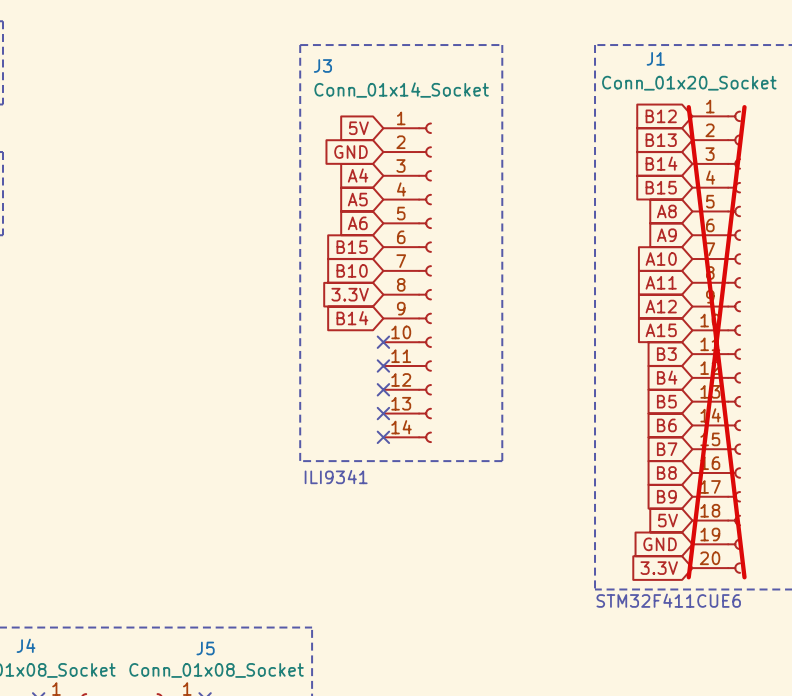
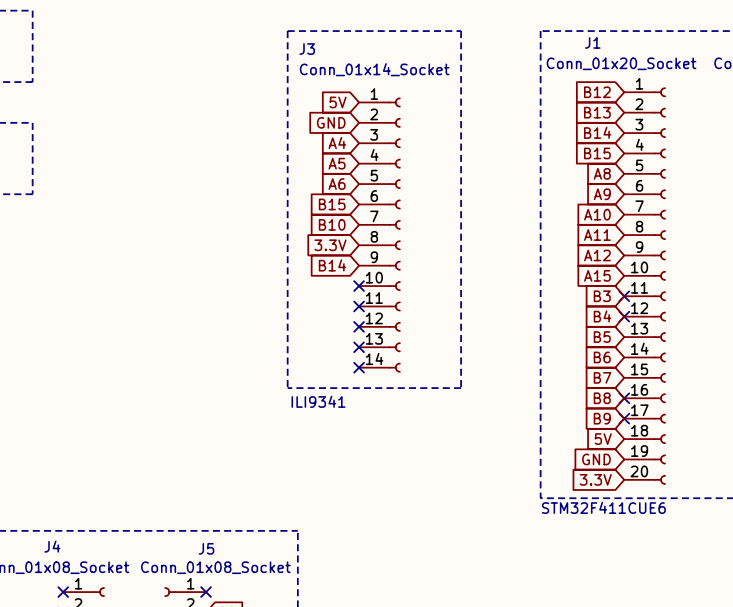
J1 do-not-place cross: (716, 342) -> none
no-connect mark: none -> (624, 296)
no-connect mark: none -> (624, 316)
no-connect mark: none -> (624, 398)
no-connect mark: none -> (624, 418)

